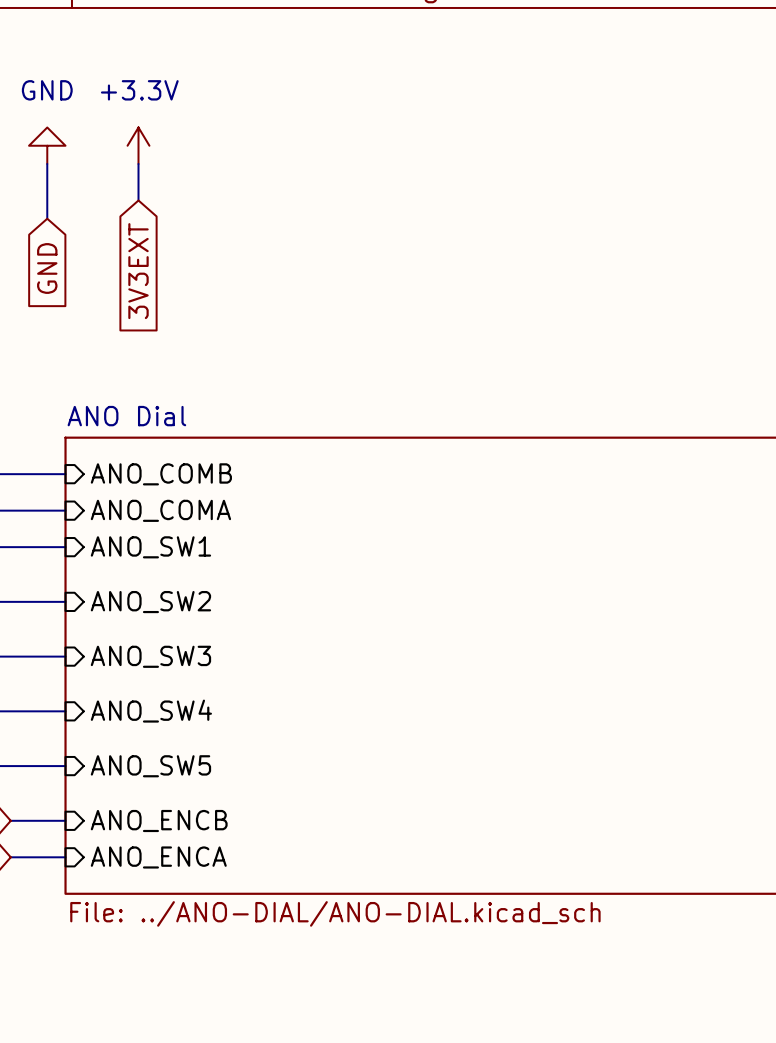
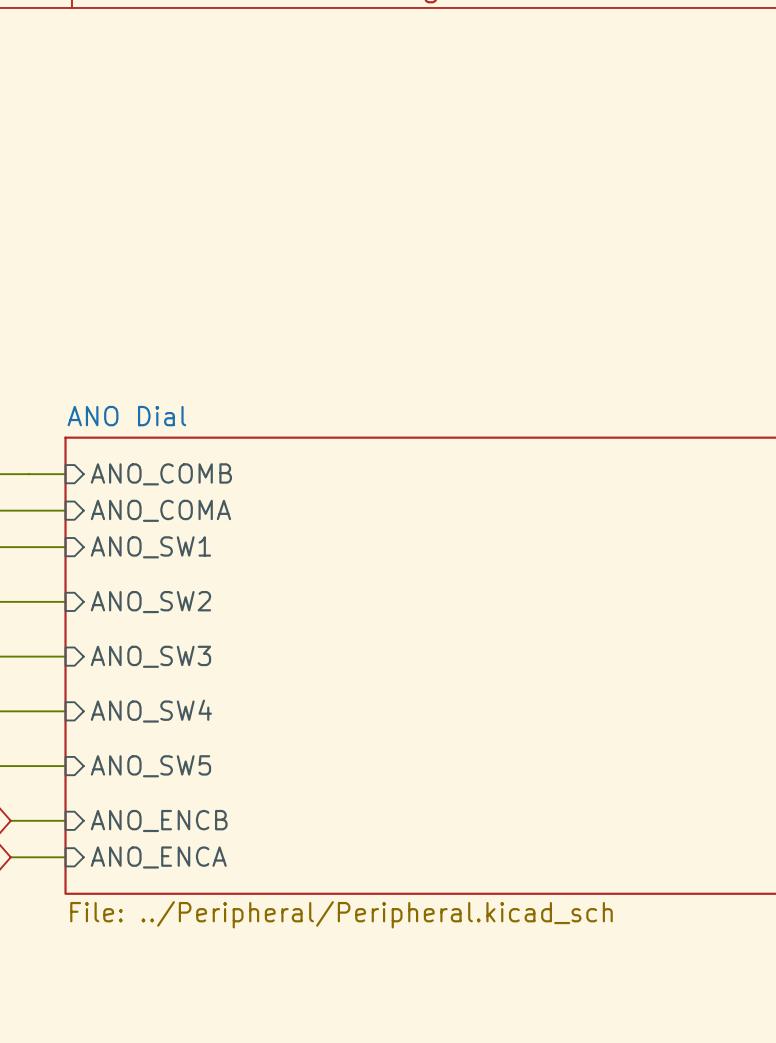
power symbol: GND (47, 145) -> none
power symbol: +3.3V (138, 145) -> none
wire: (47, 163) (47, 218) -> none
wire: (138, 163) (138, 200) -> none
global label: GND (47, 268) -> none
global label: 3V3EXT (138, 271) -> none
sheet ANO Dial value: File: ../ANO-DIAL/ANO-DIAL.kicad_sch (335, 913) -> File: ../Peripheral/Peripheral.kicad_sch (341, 914)

